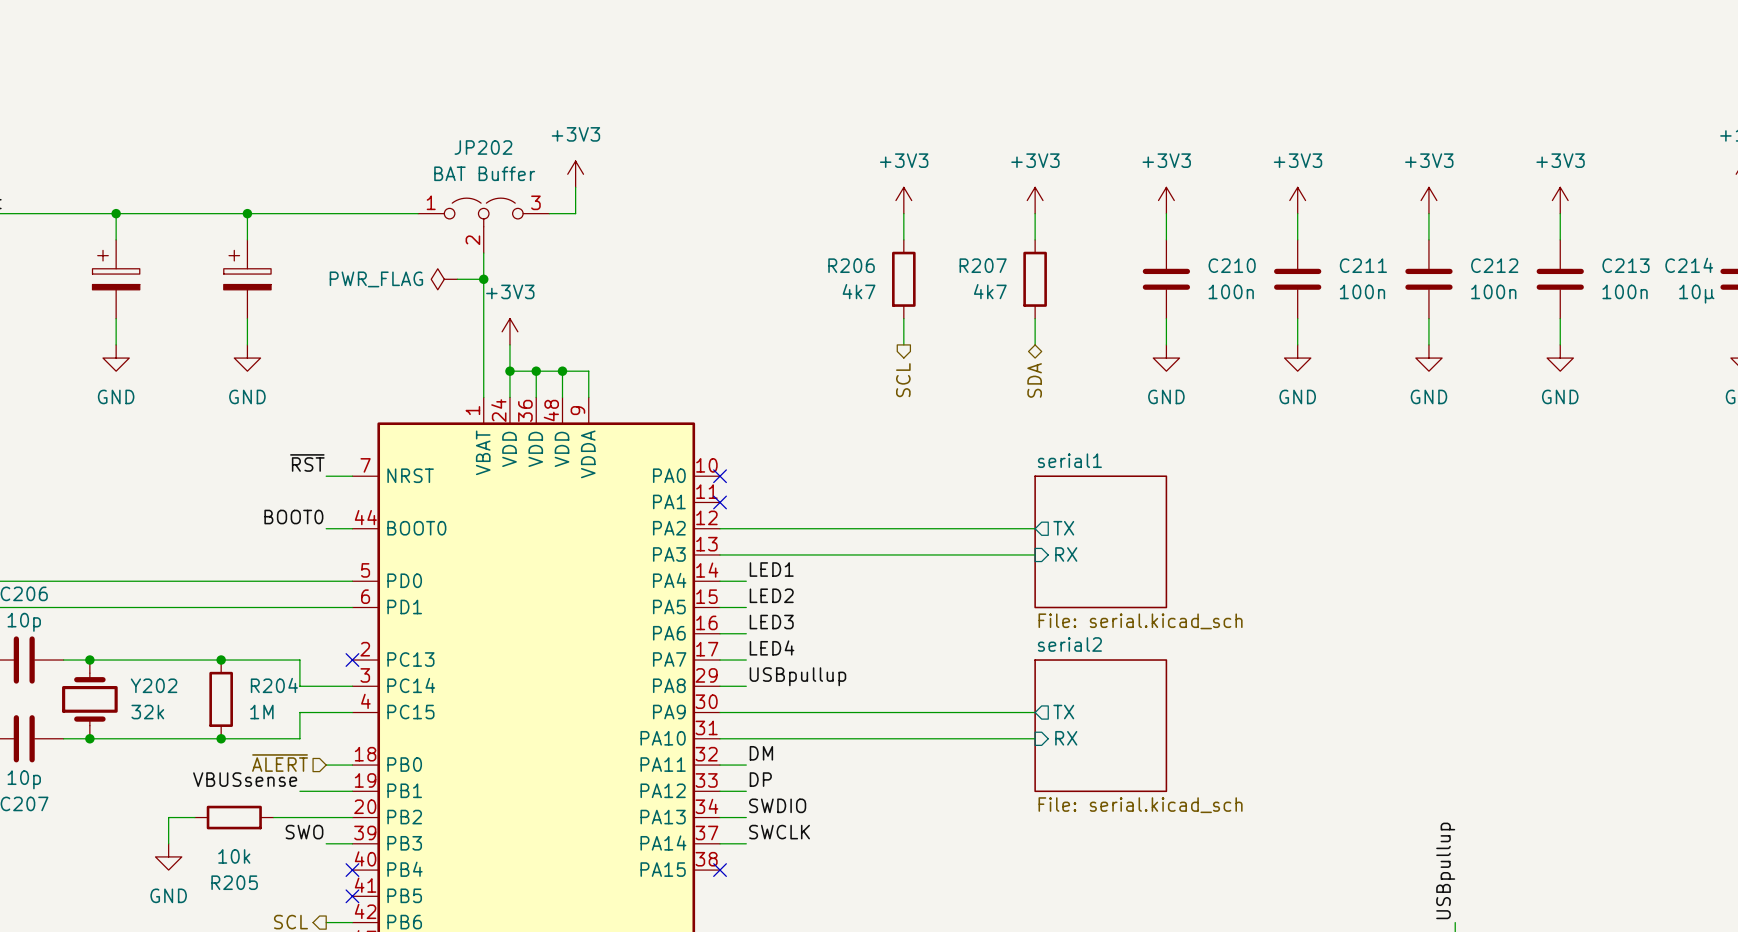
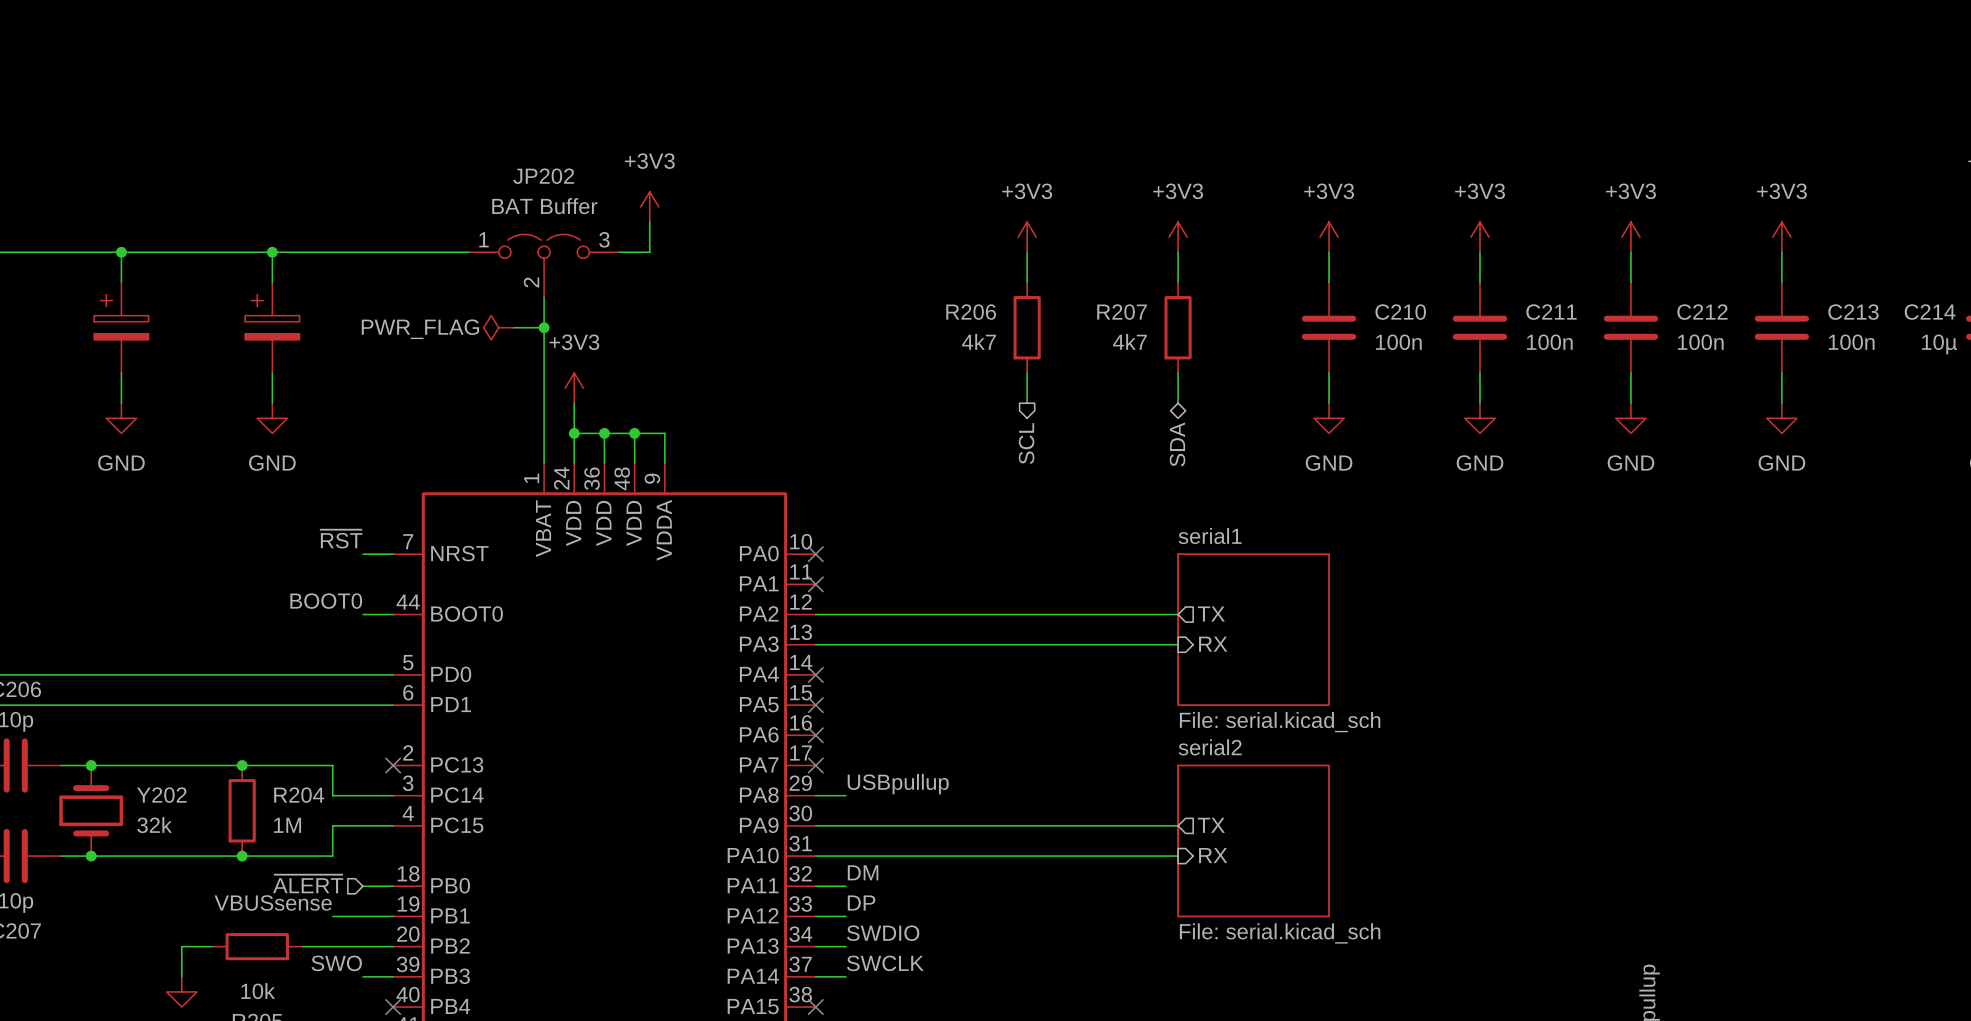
label: LED1 (771, 569) -> none
wire: (720, 581) (746, 581) -> none
no-connect mark: none -> (815, 674)
label: LED2 (771, 595) -> none
wire: (720, 607) (746, 607) -> none
no-connect mark: none -> (815, 705)
label: LED3 (771, 622) -> none
wire: (720, 633) (746, 633) -> none
no-connect mark: none -> (815, 735)
label: LED4 (772, 647) -> none
wire: (720, 660) (746, 660) -> none
no-connect mark: none -> (815, 765)

